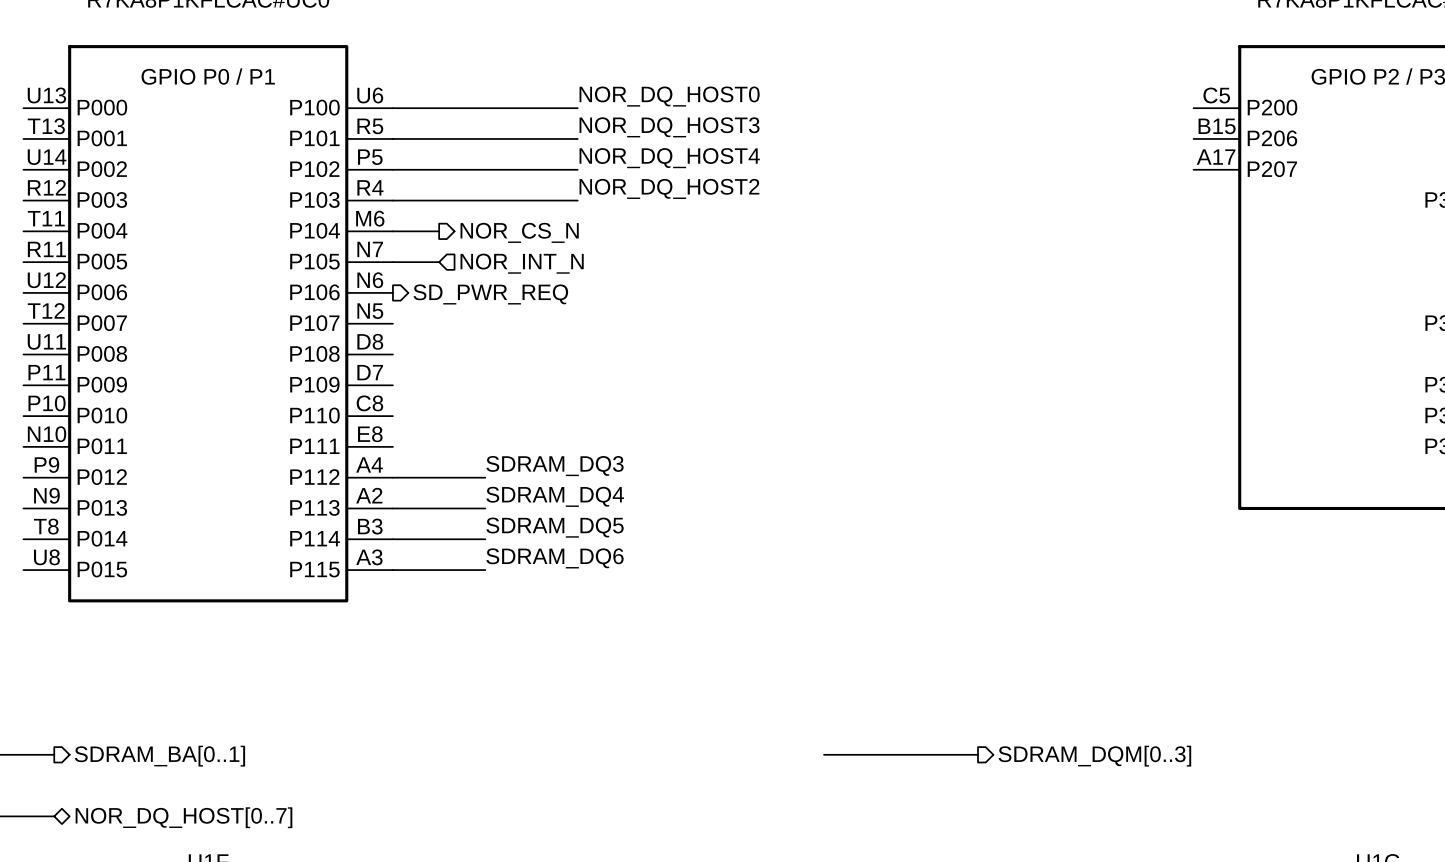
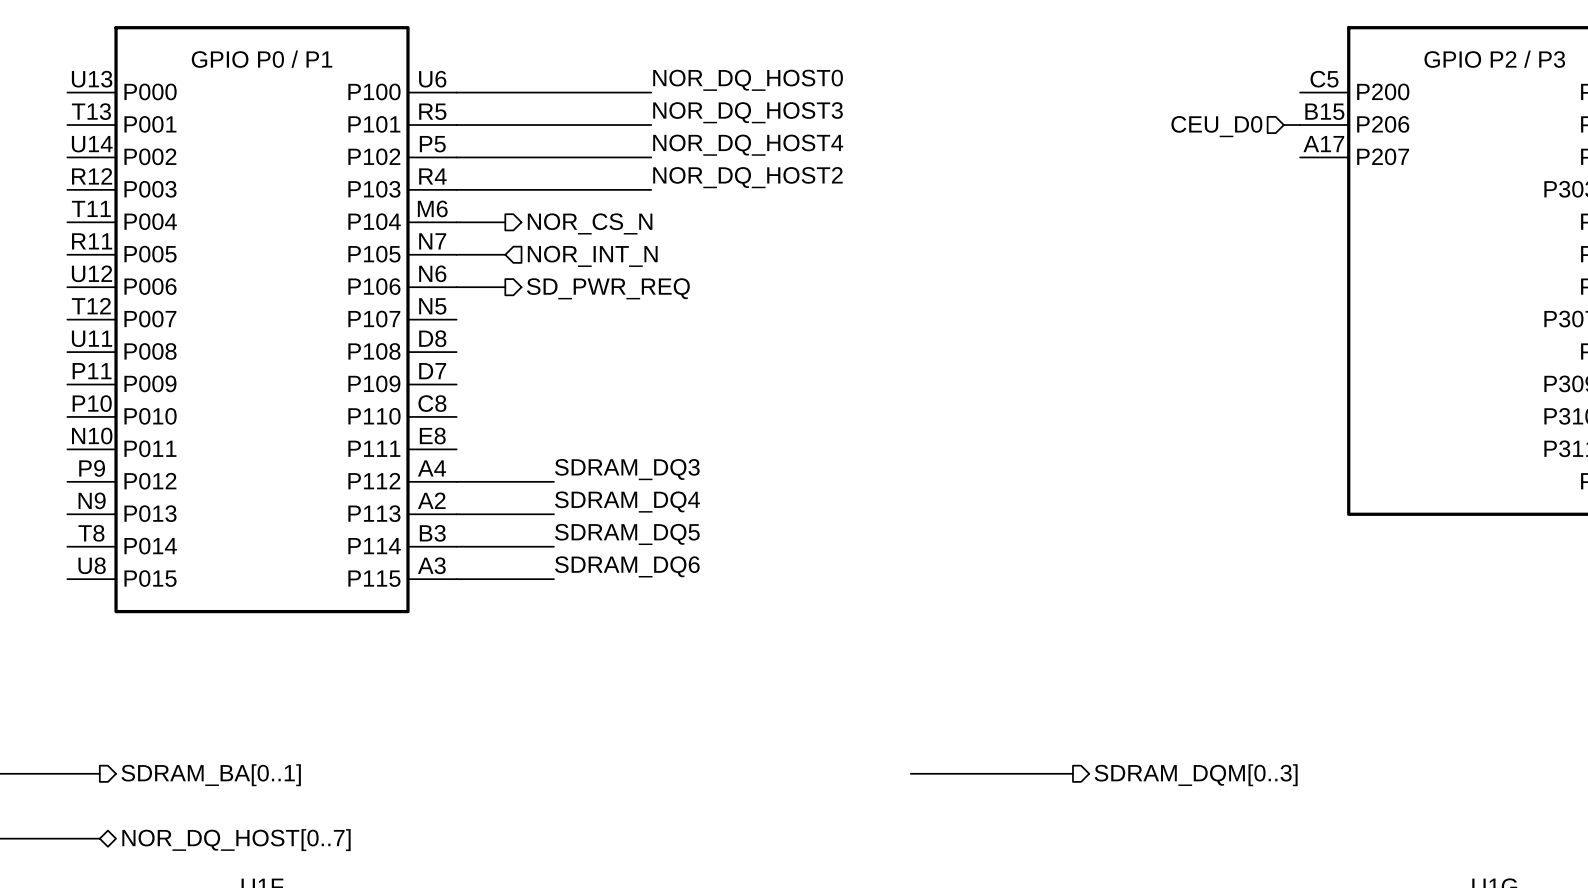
wire: none -> (1283, 125) (1300, 125)
hierarchical label: none -> CEU_D0 (1216, 126)
wire: none -> (456, 287) (505, 287)
hierarchical label position: SD_PWR_REQ (490, 294) -> SD_PWR_REQ (608, 288)

